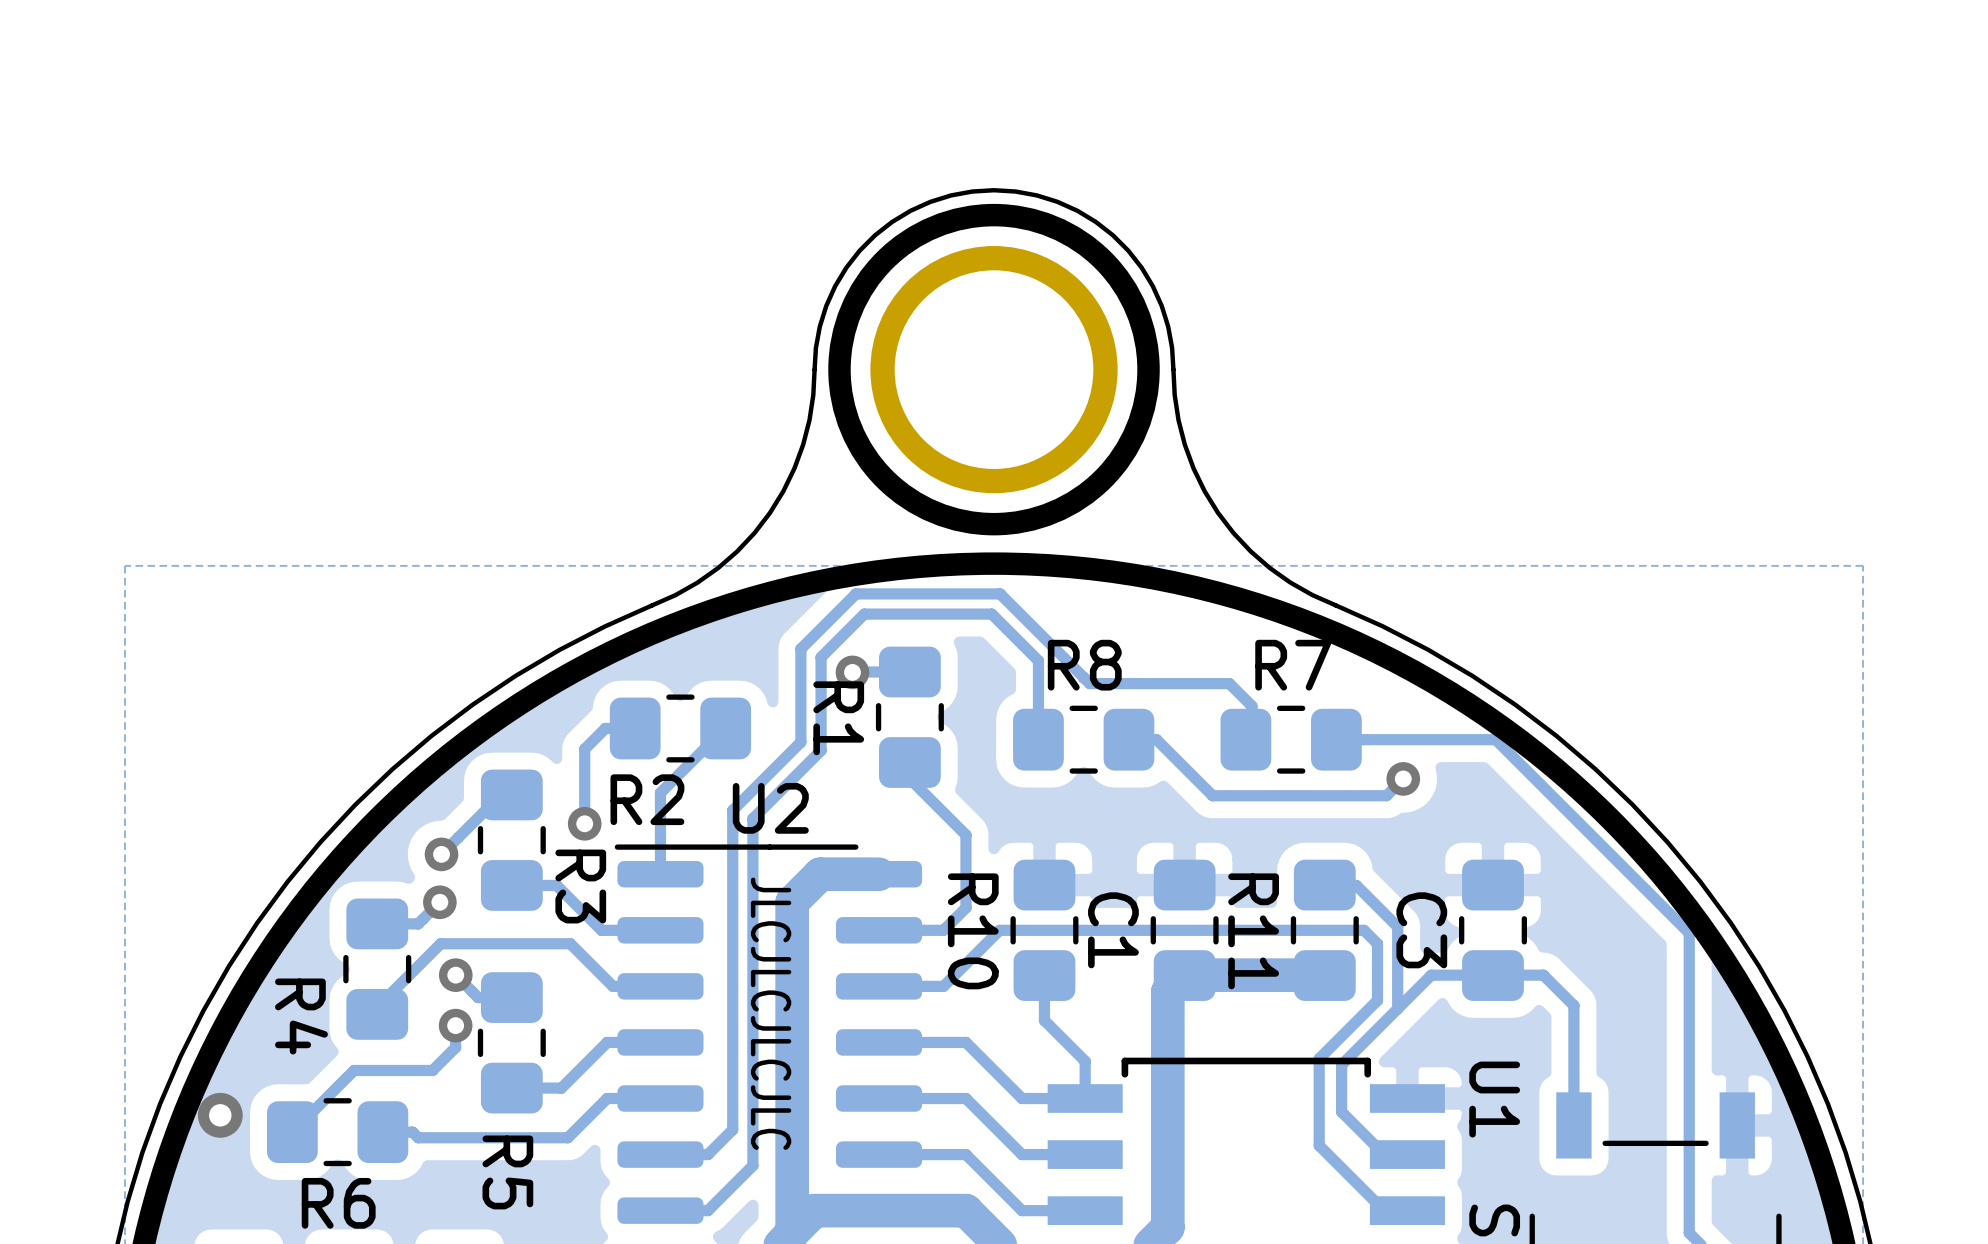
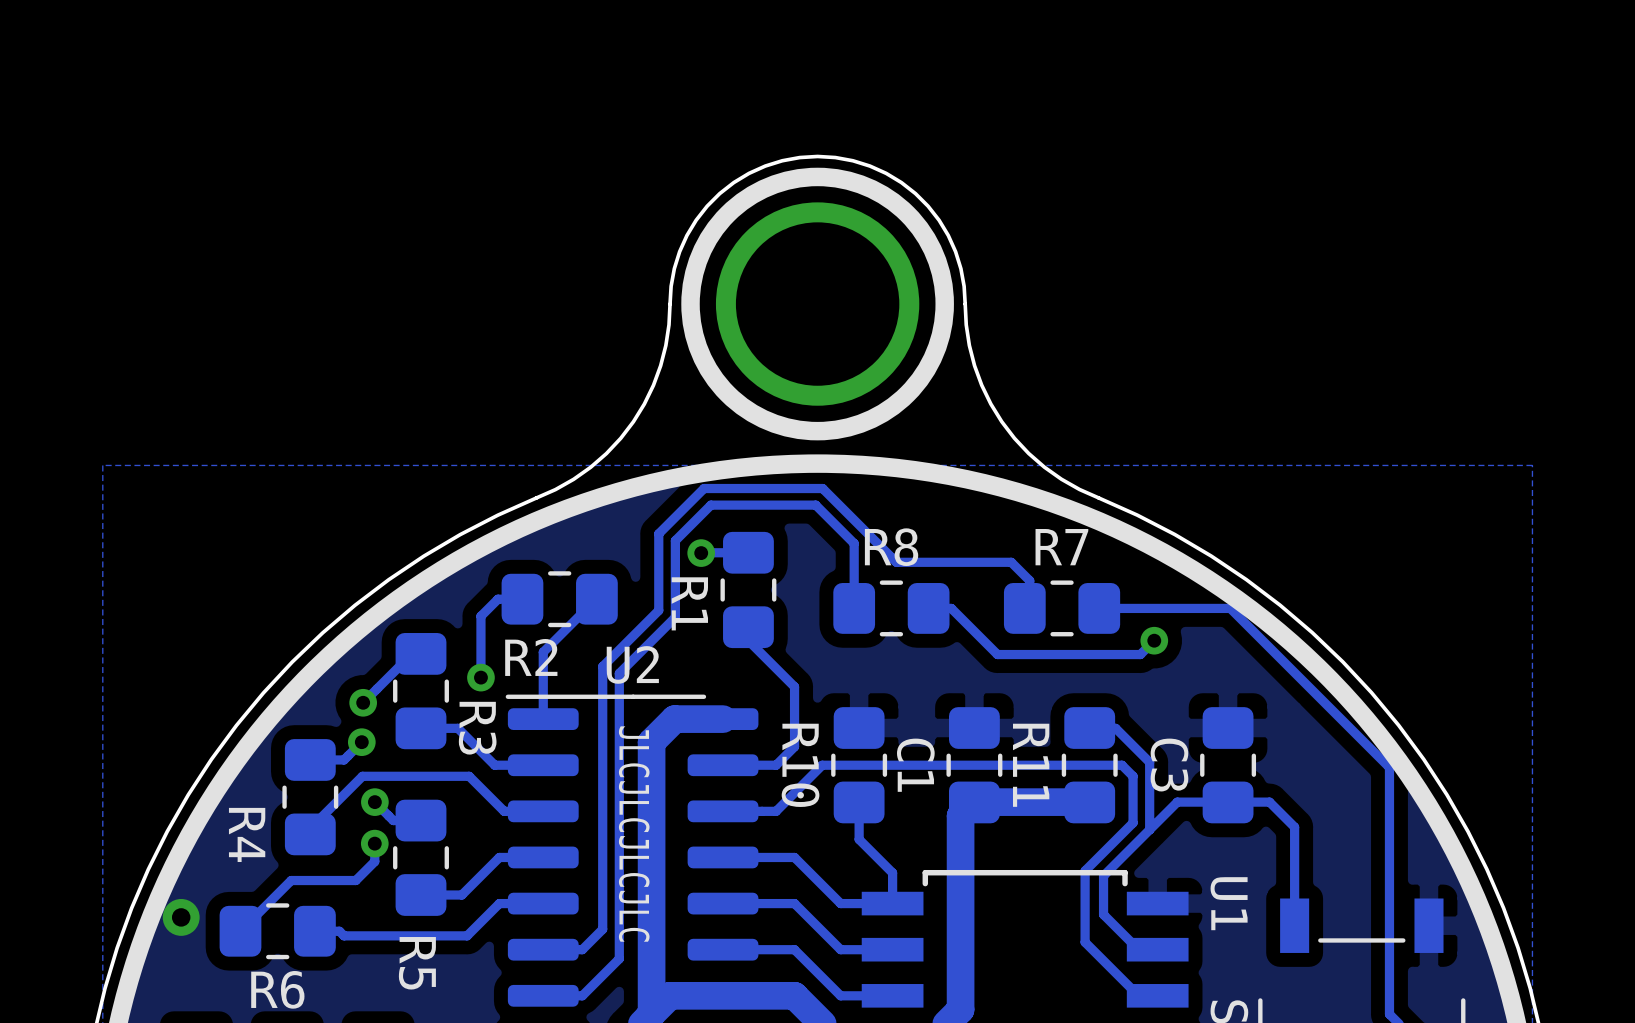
R1 name position: R1 (838, 718) -> R1 (689, 603)

